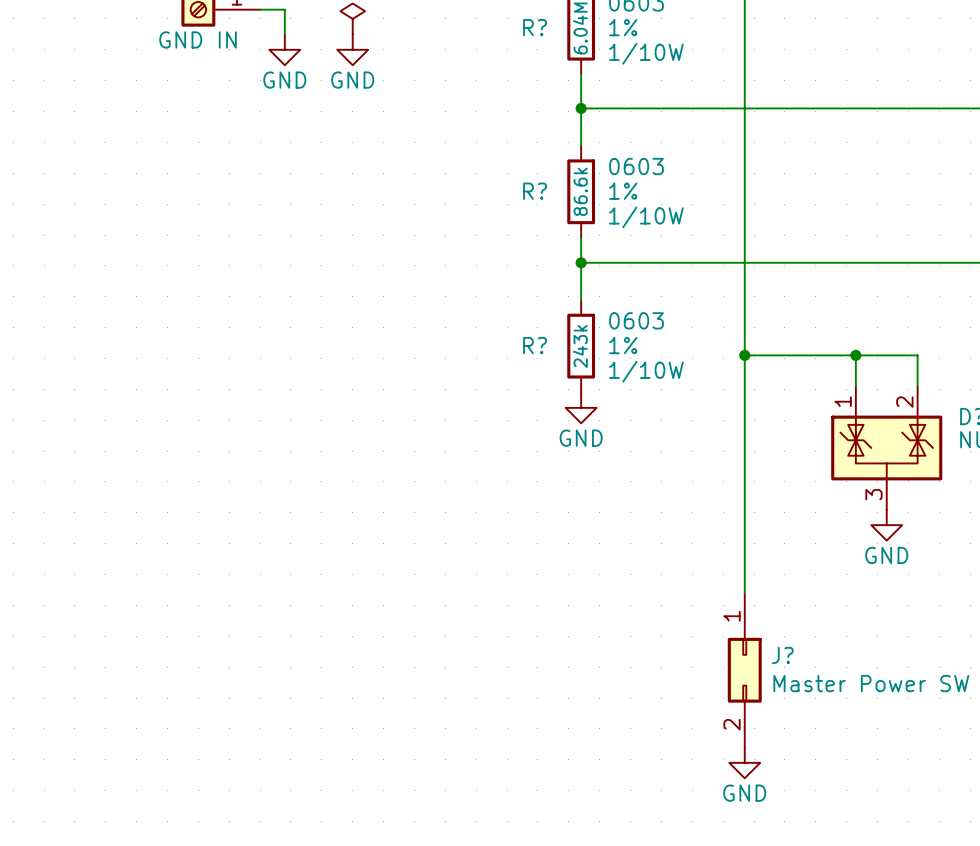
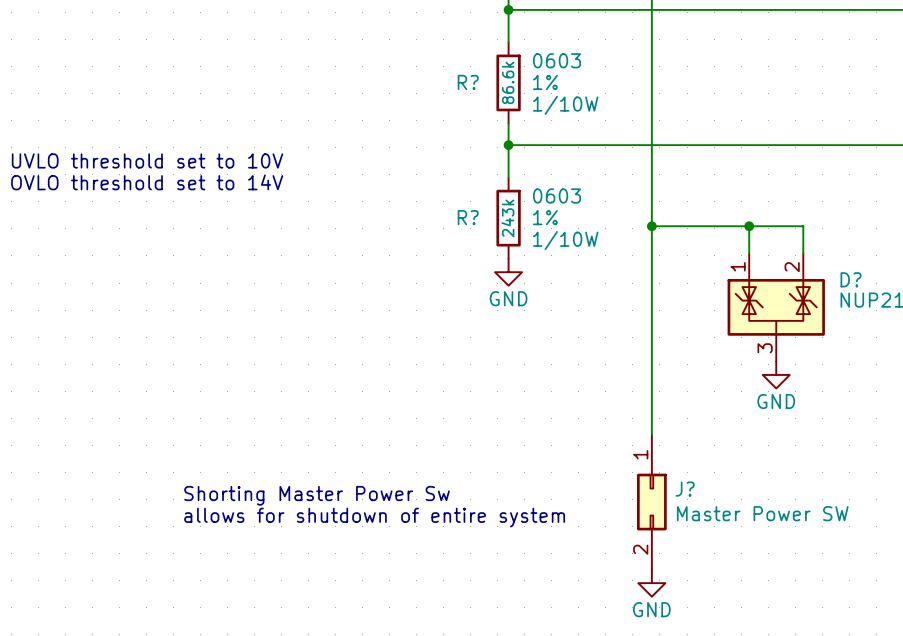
text: none -> UVLO threshold set to 10V (147, 160)
text: none -> OVLO threshold set to 14V (147, 182)
text: none -> Shorting Master Power Sw (317, 495)
text: none -> allows for shutdown of entire system (374, 517)

